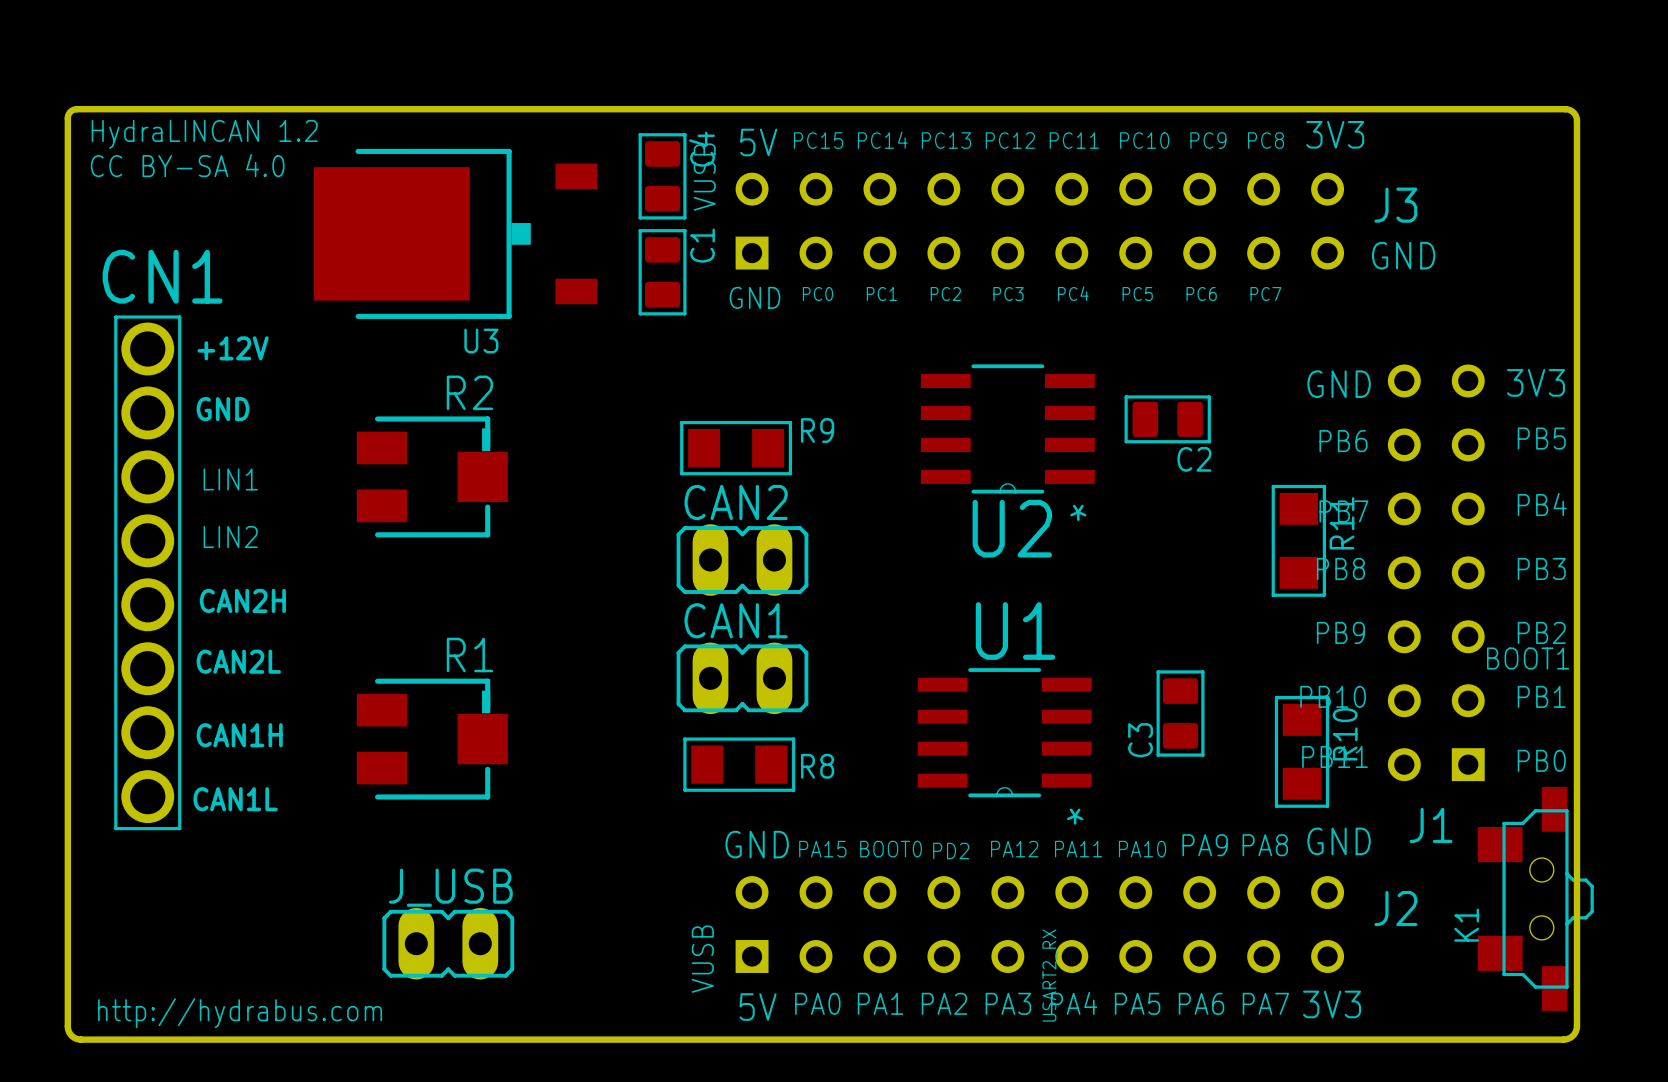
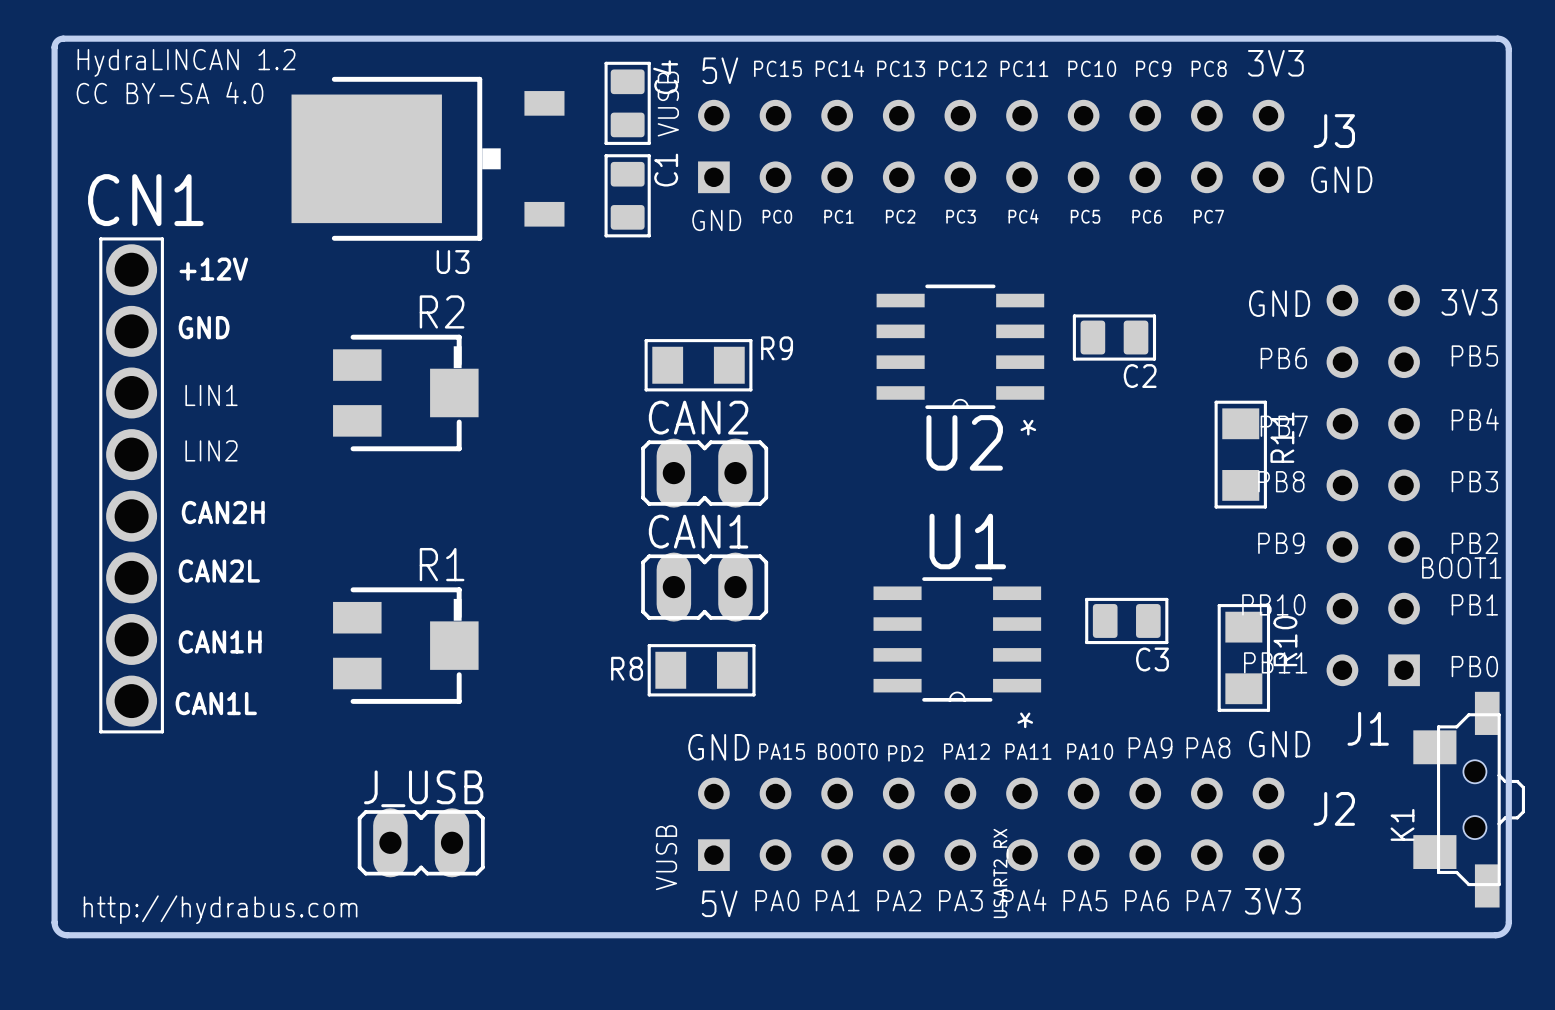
C3 rotation: 0° (1180, 713) -> 90° clockwise (1126, 620)
C3 name position: C3 (1140, 740) -> C3 (1152, 659)
R8 name position: R8 (817, 766) -> R8 (627, 668)

